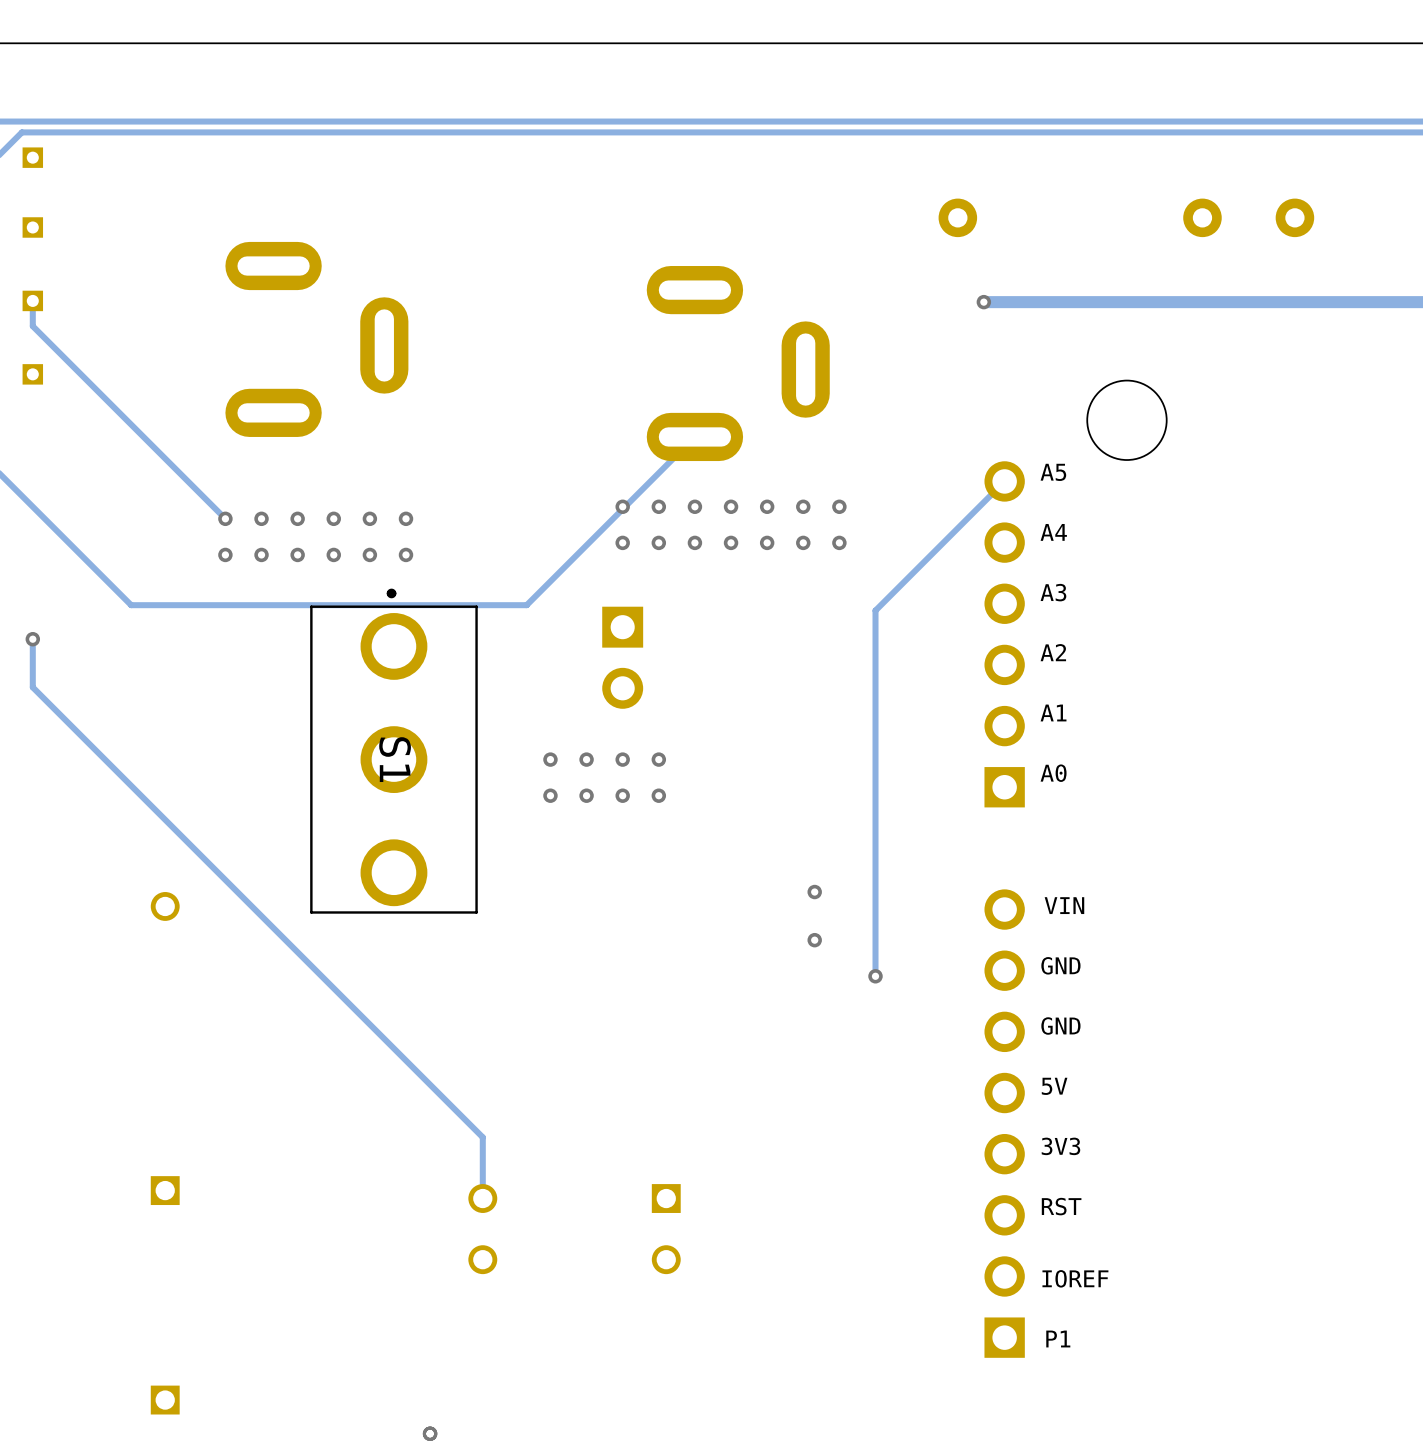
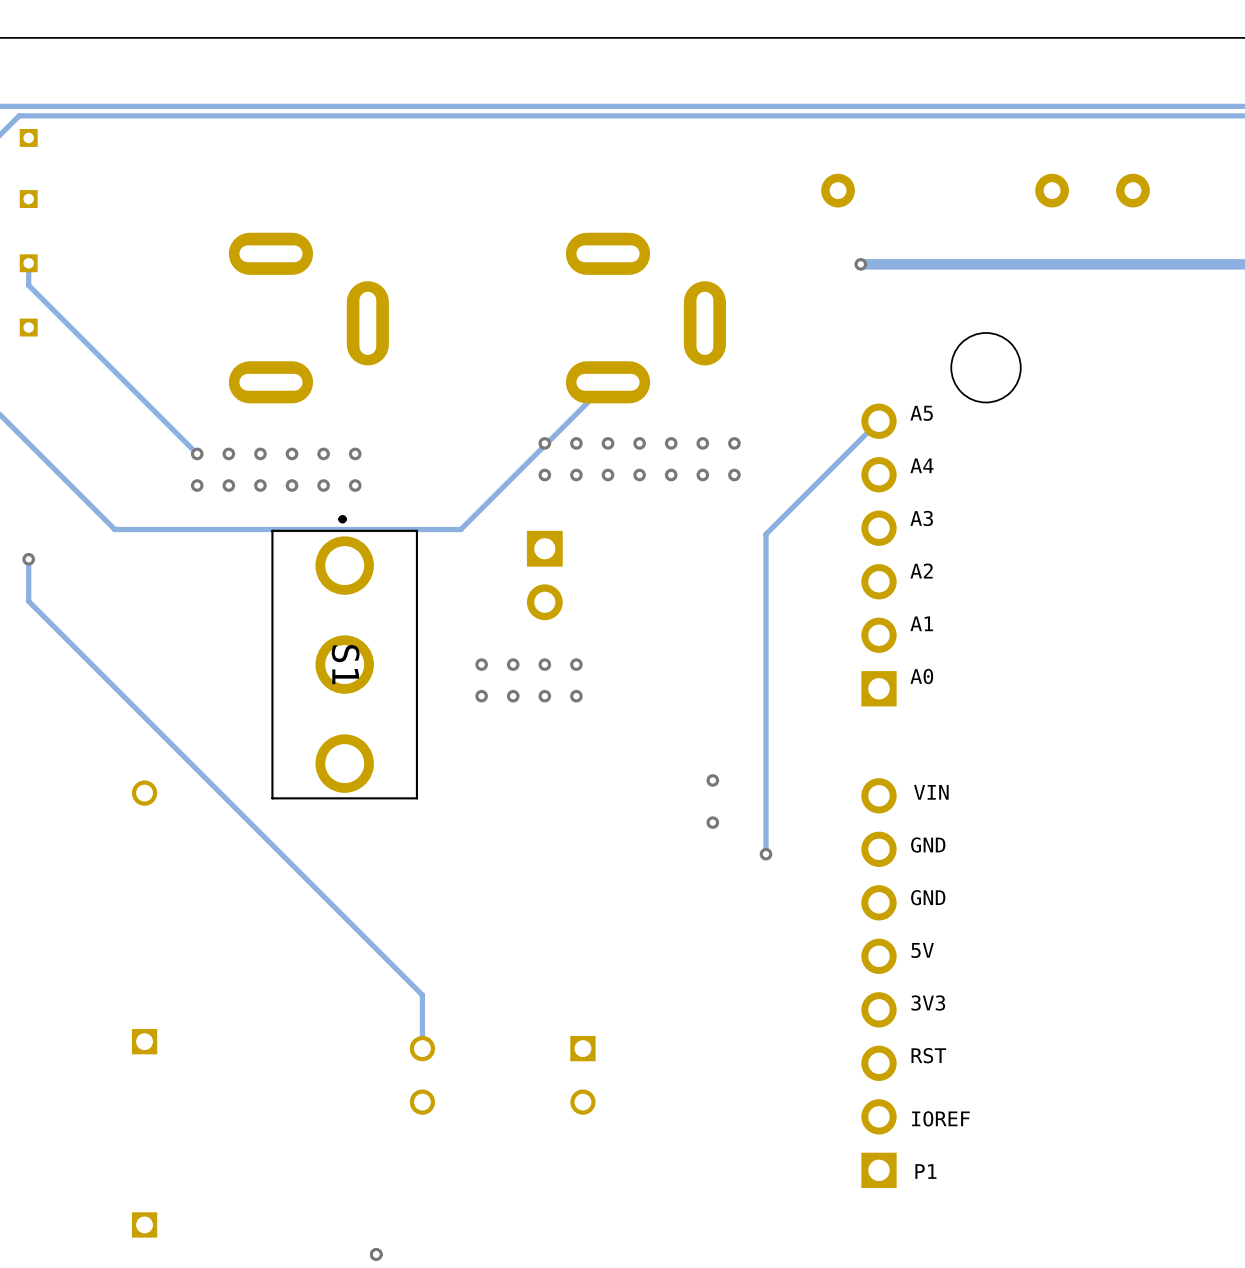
part position: (316, 339) -> (308, 318)

